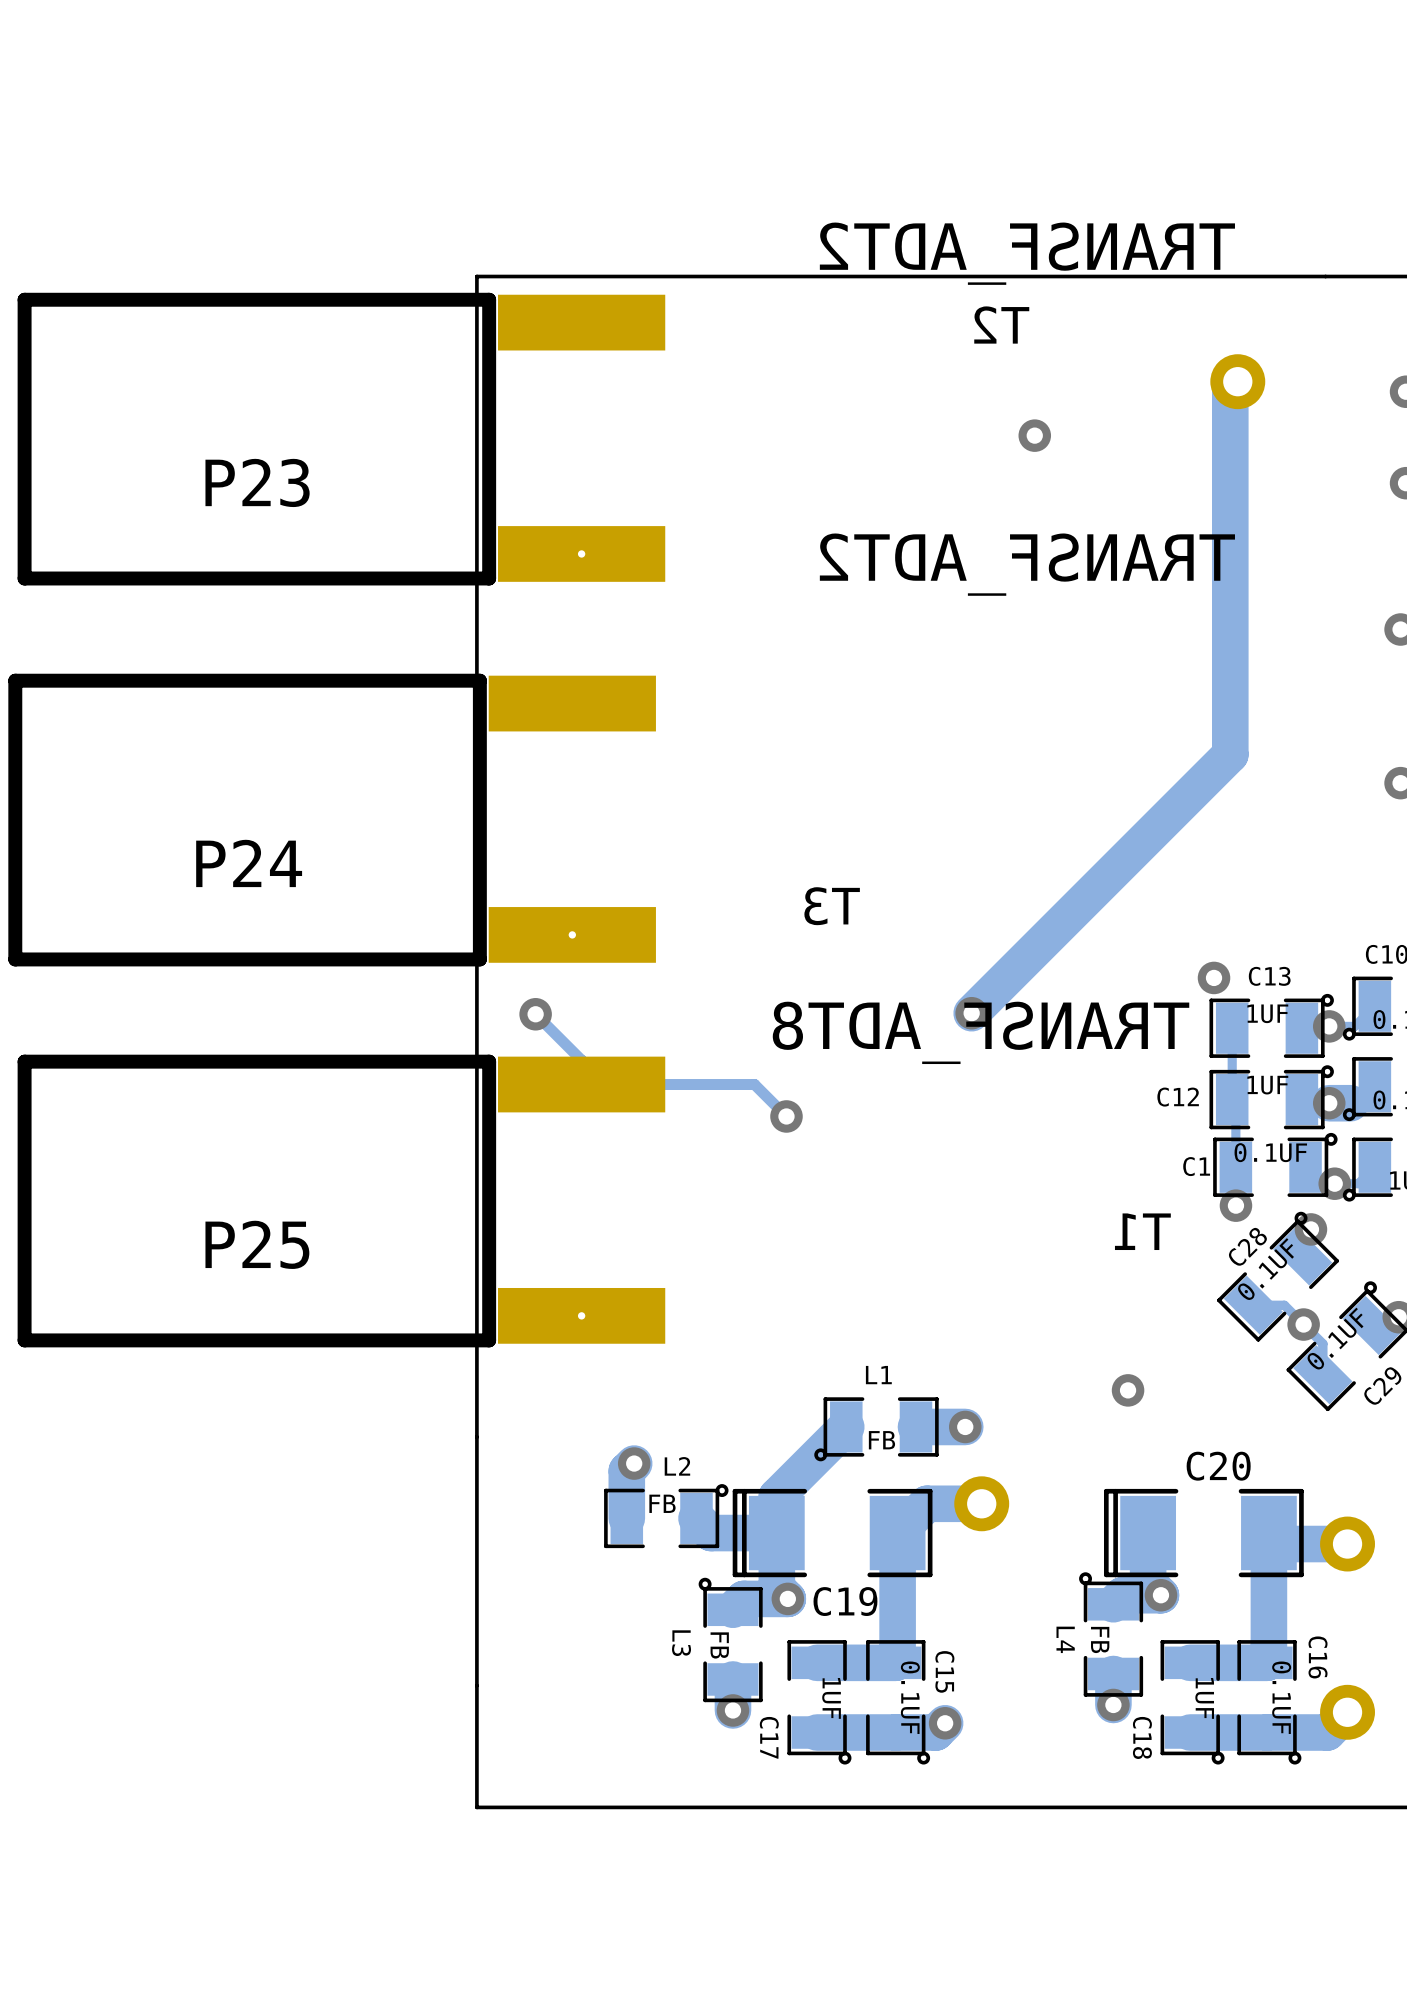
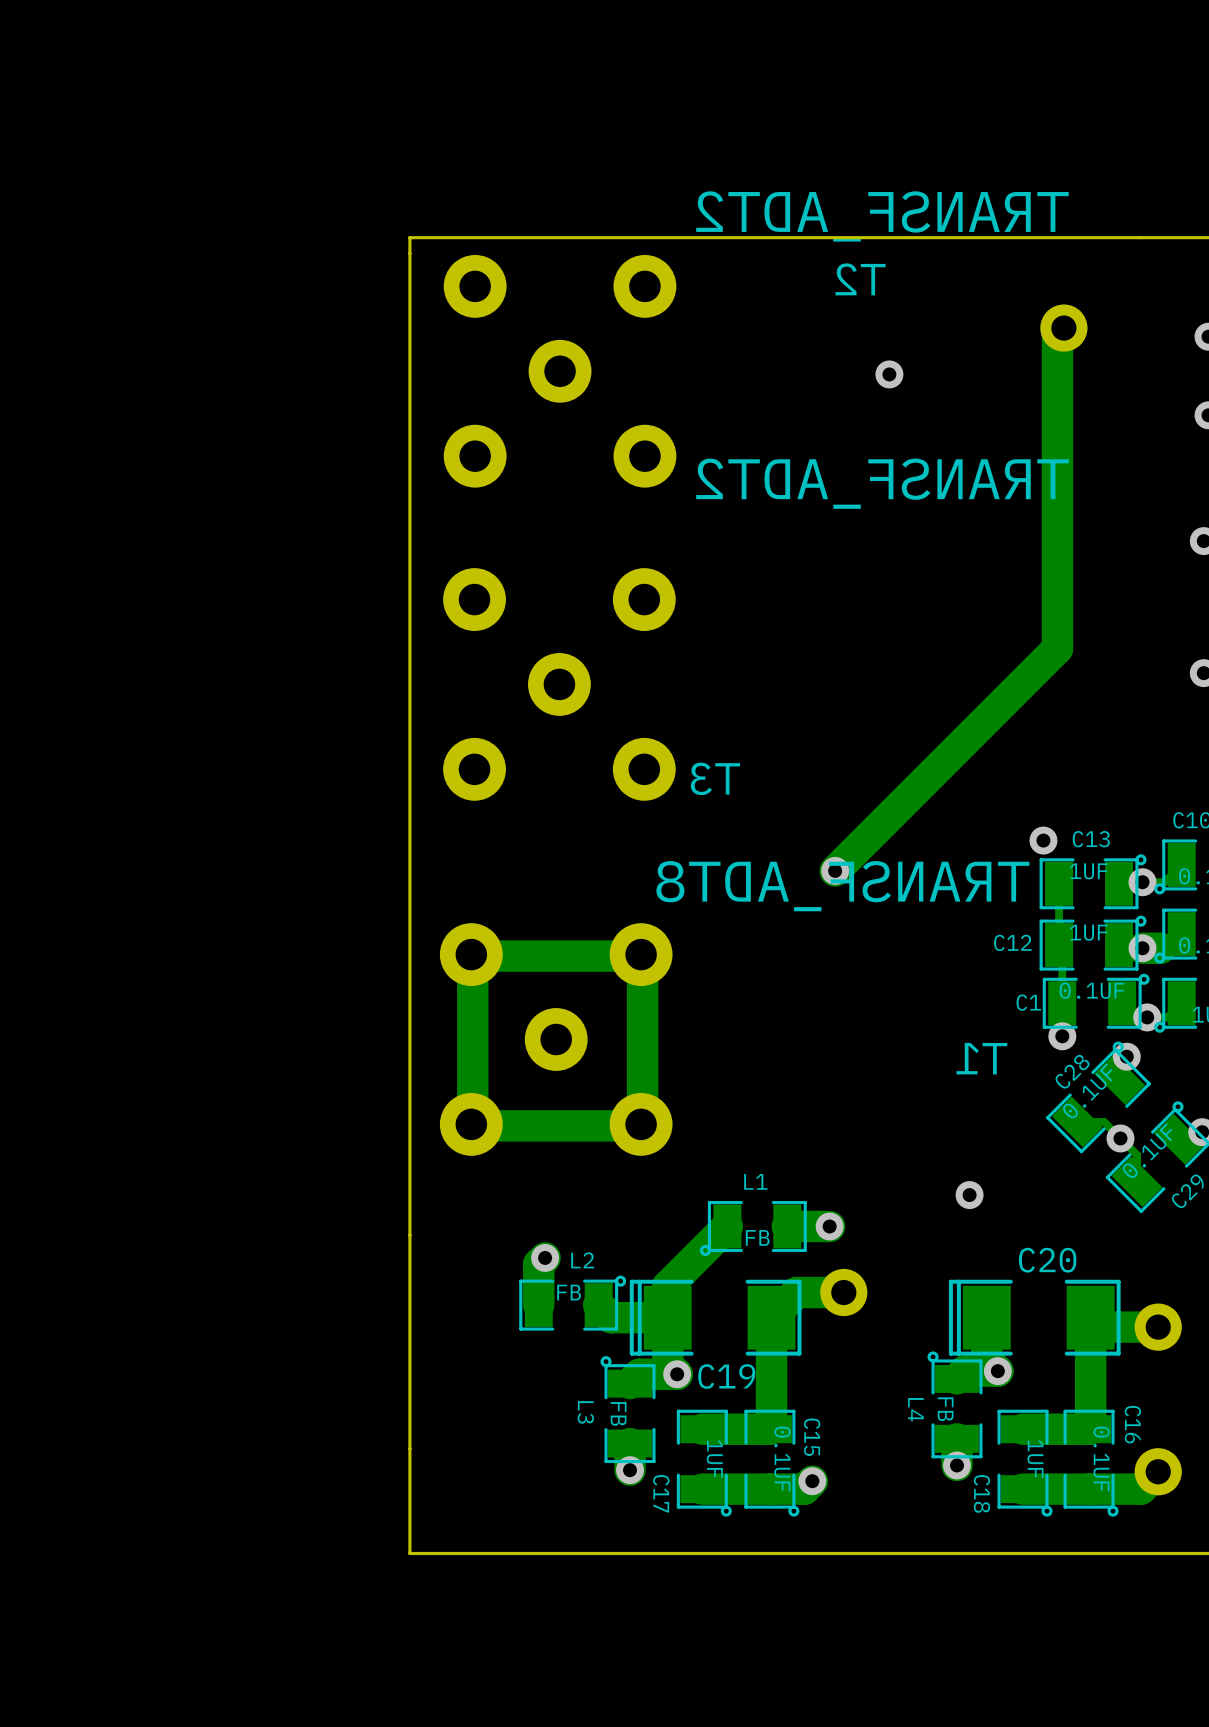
part: none -> (560, 371)
P23: (341, 439) -> none
part: none -> (559, 684)
P24: (332, 820) -> none
track: (535, 1014) (581, 1060) (581, 1084) (754, 1084) (786, 1116) -> none
via: (535, 1014) -> none
track: none -> (642, 956) (472, 956) (472, 1125) (642, 1125) (642, 956)
via: (786, 1116) -> none
P25: (341, 1201) -> none
part: none -> (556, 1039)

